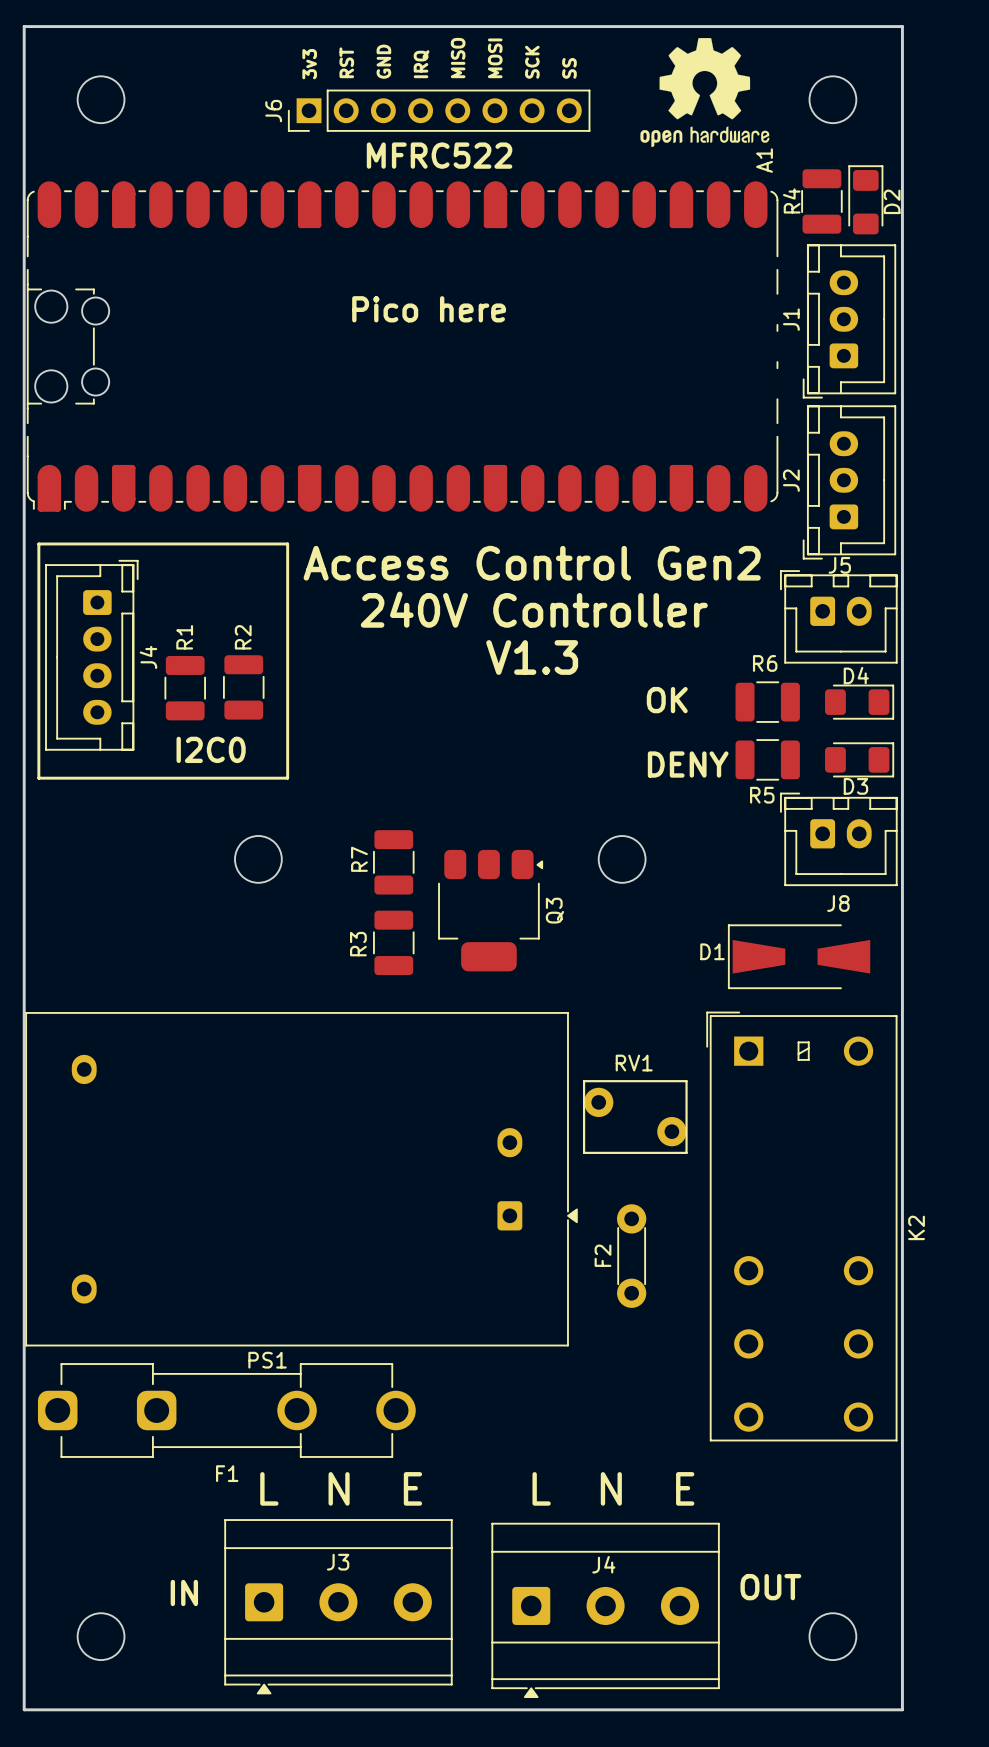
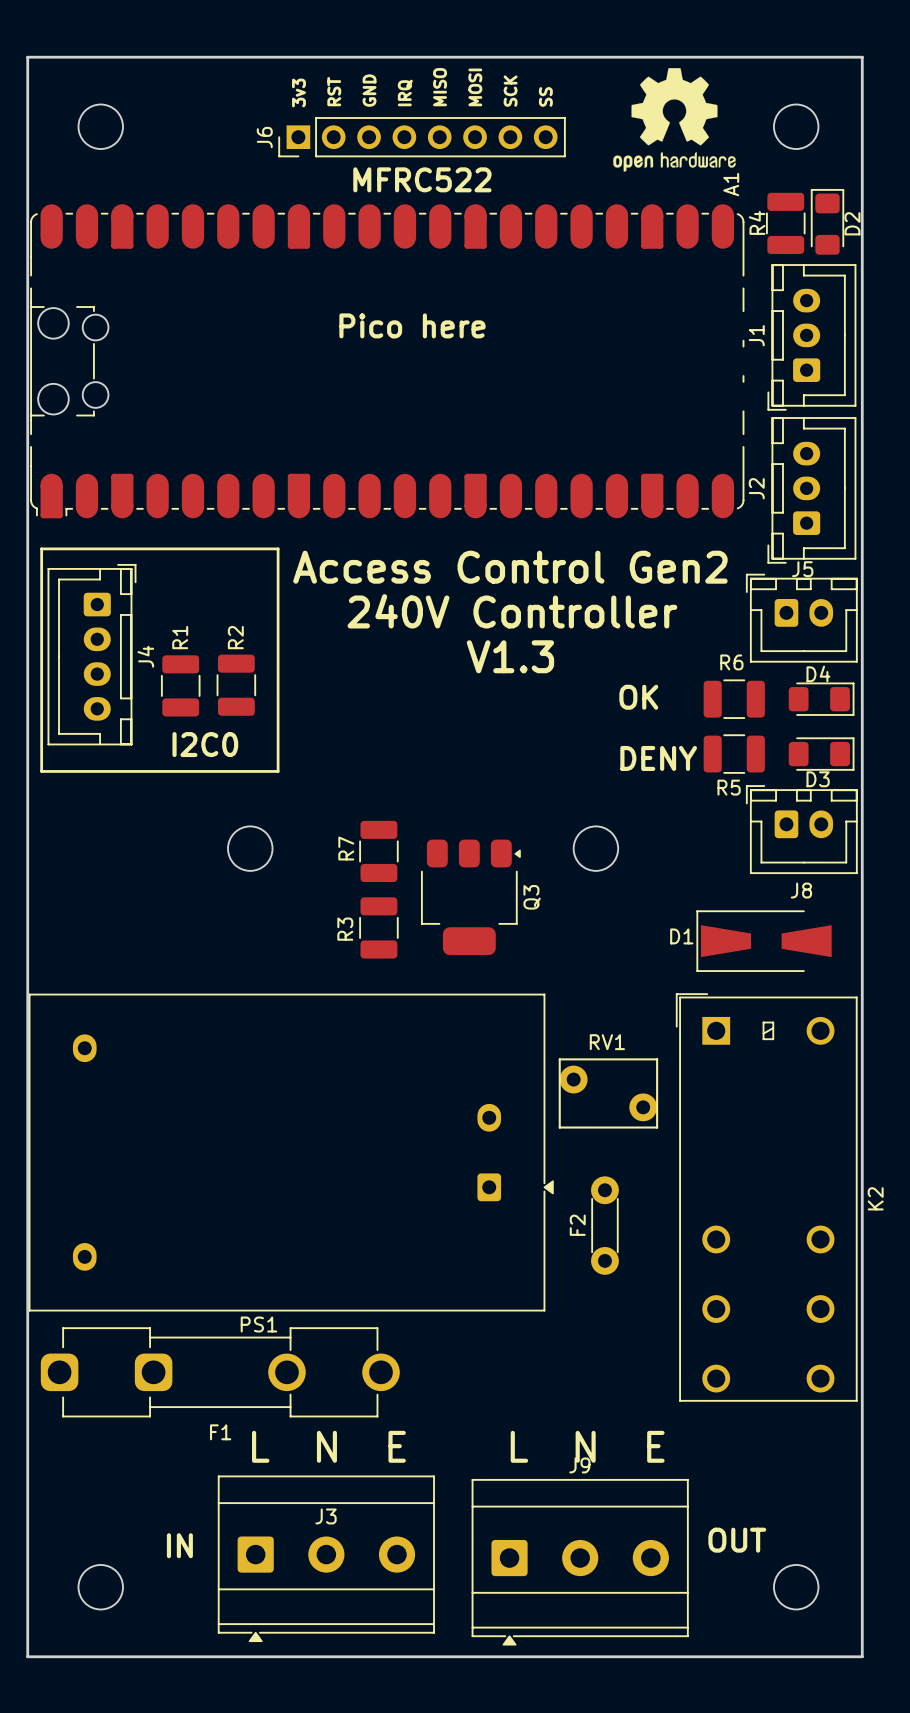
J4 name: J4 (603, 1564) -> J9 (579, 1465)

